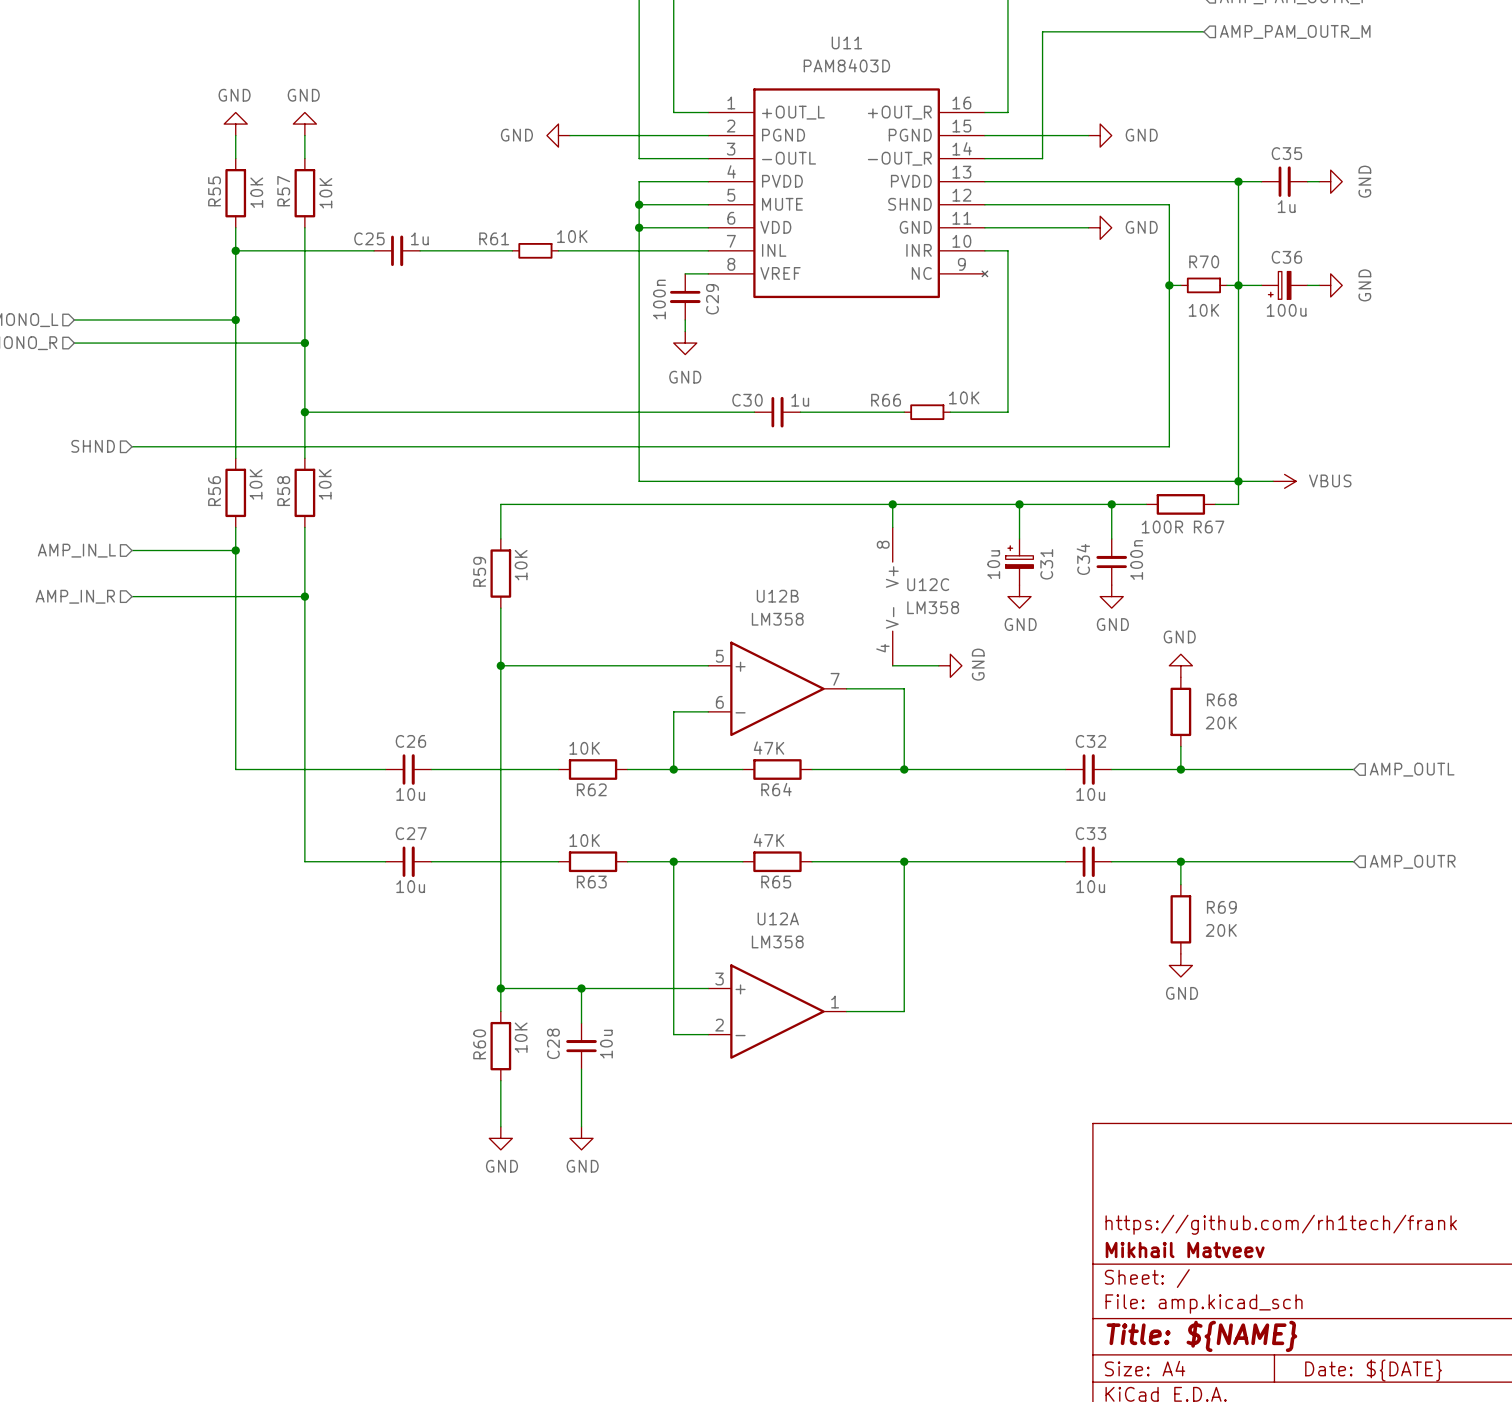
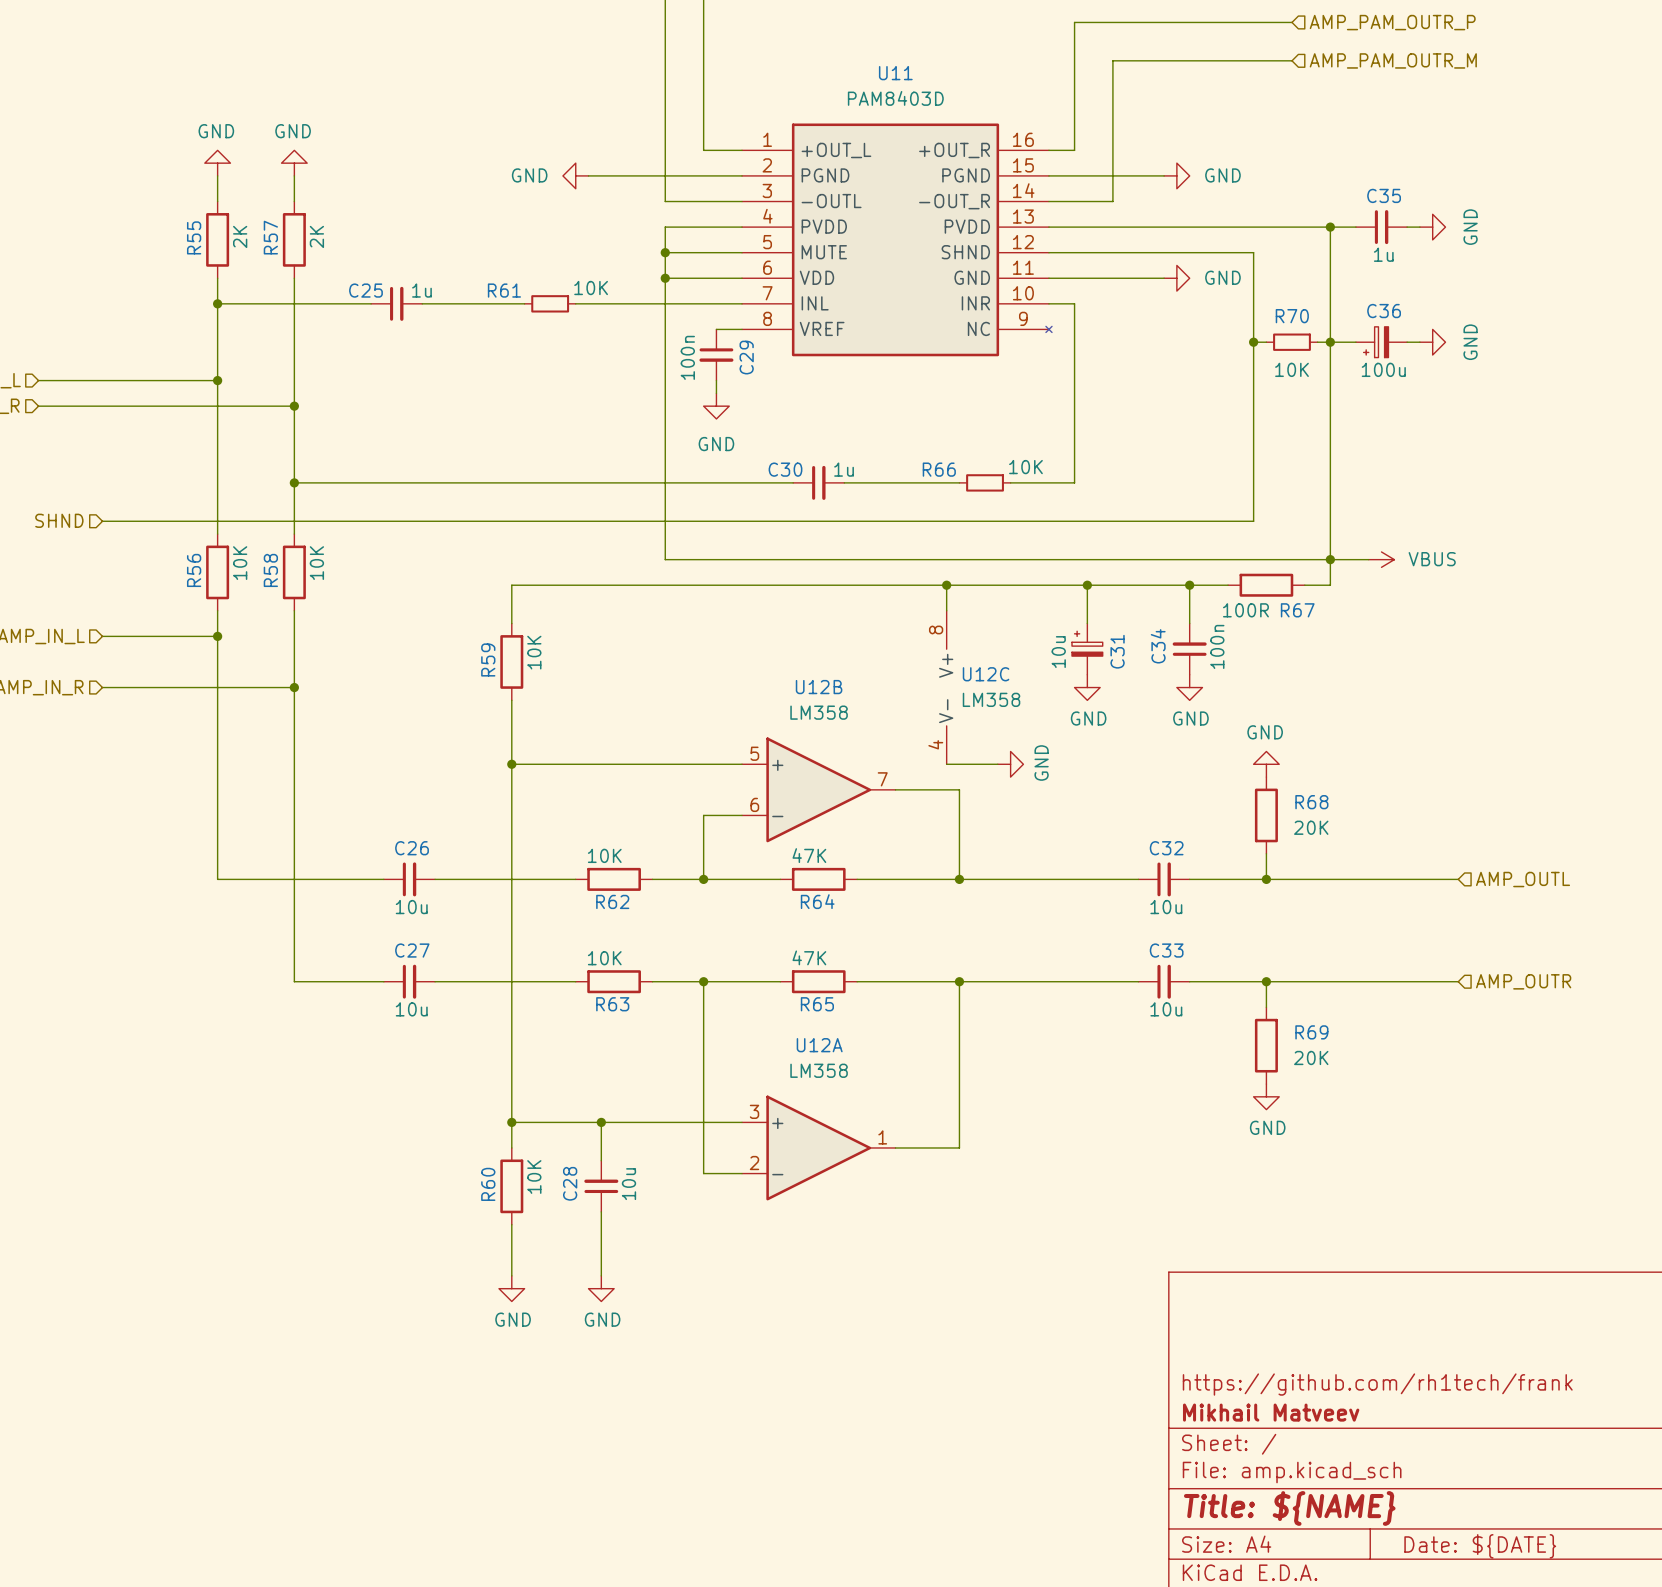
R55 value: 10K (256, 192) -> 2K (240, 236)
R57 value: 10K (325, 193) -> 2K (316, 236)

